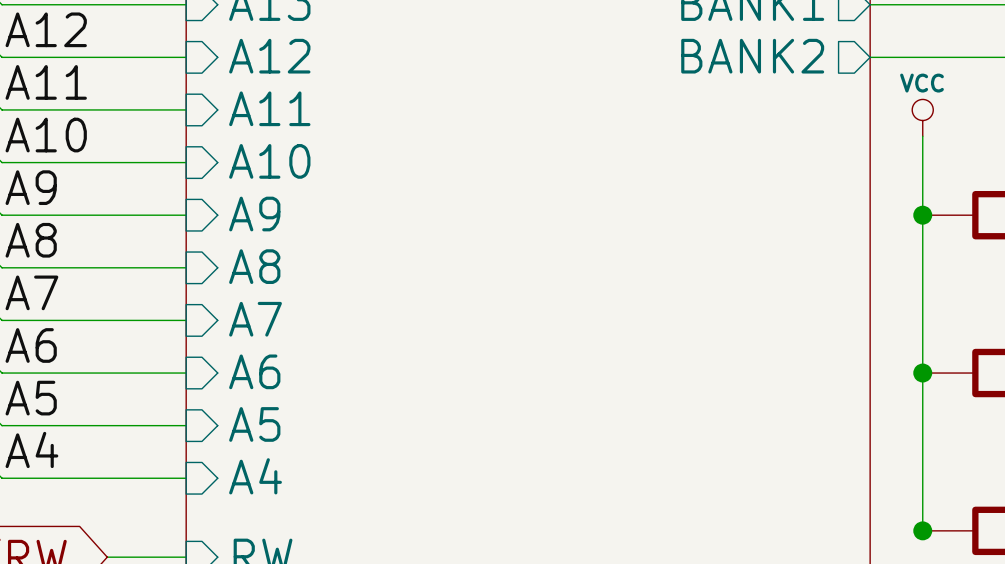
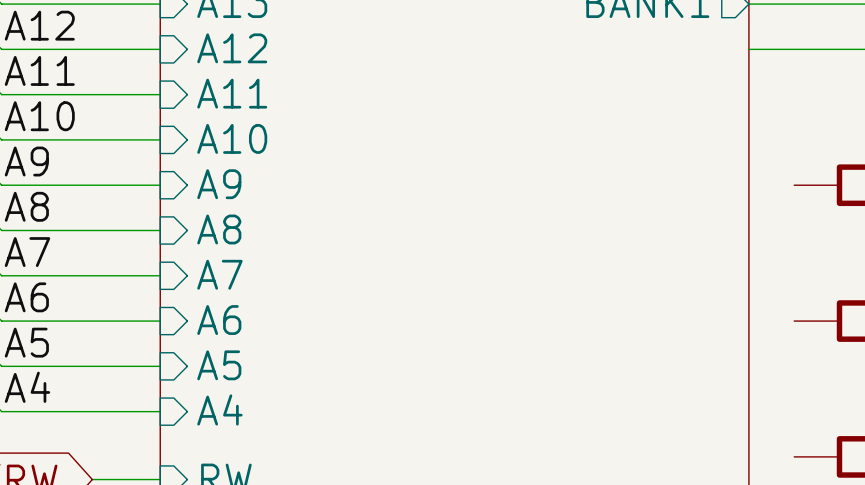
sheet pin: BANK2 (752, 56) -> none
power symbol: VCC (922, 117) -> none
wire: (922, 136) (922, 530) -> none
junction: (922, 215) -> none
junction: (922, 373) -> none
junction: (922, 530) -> none

